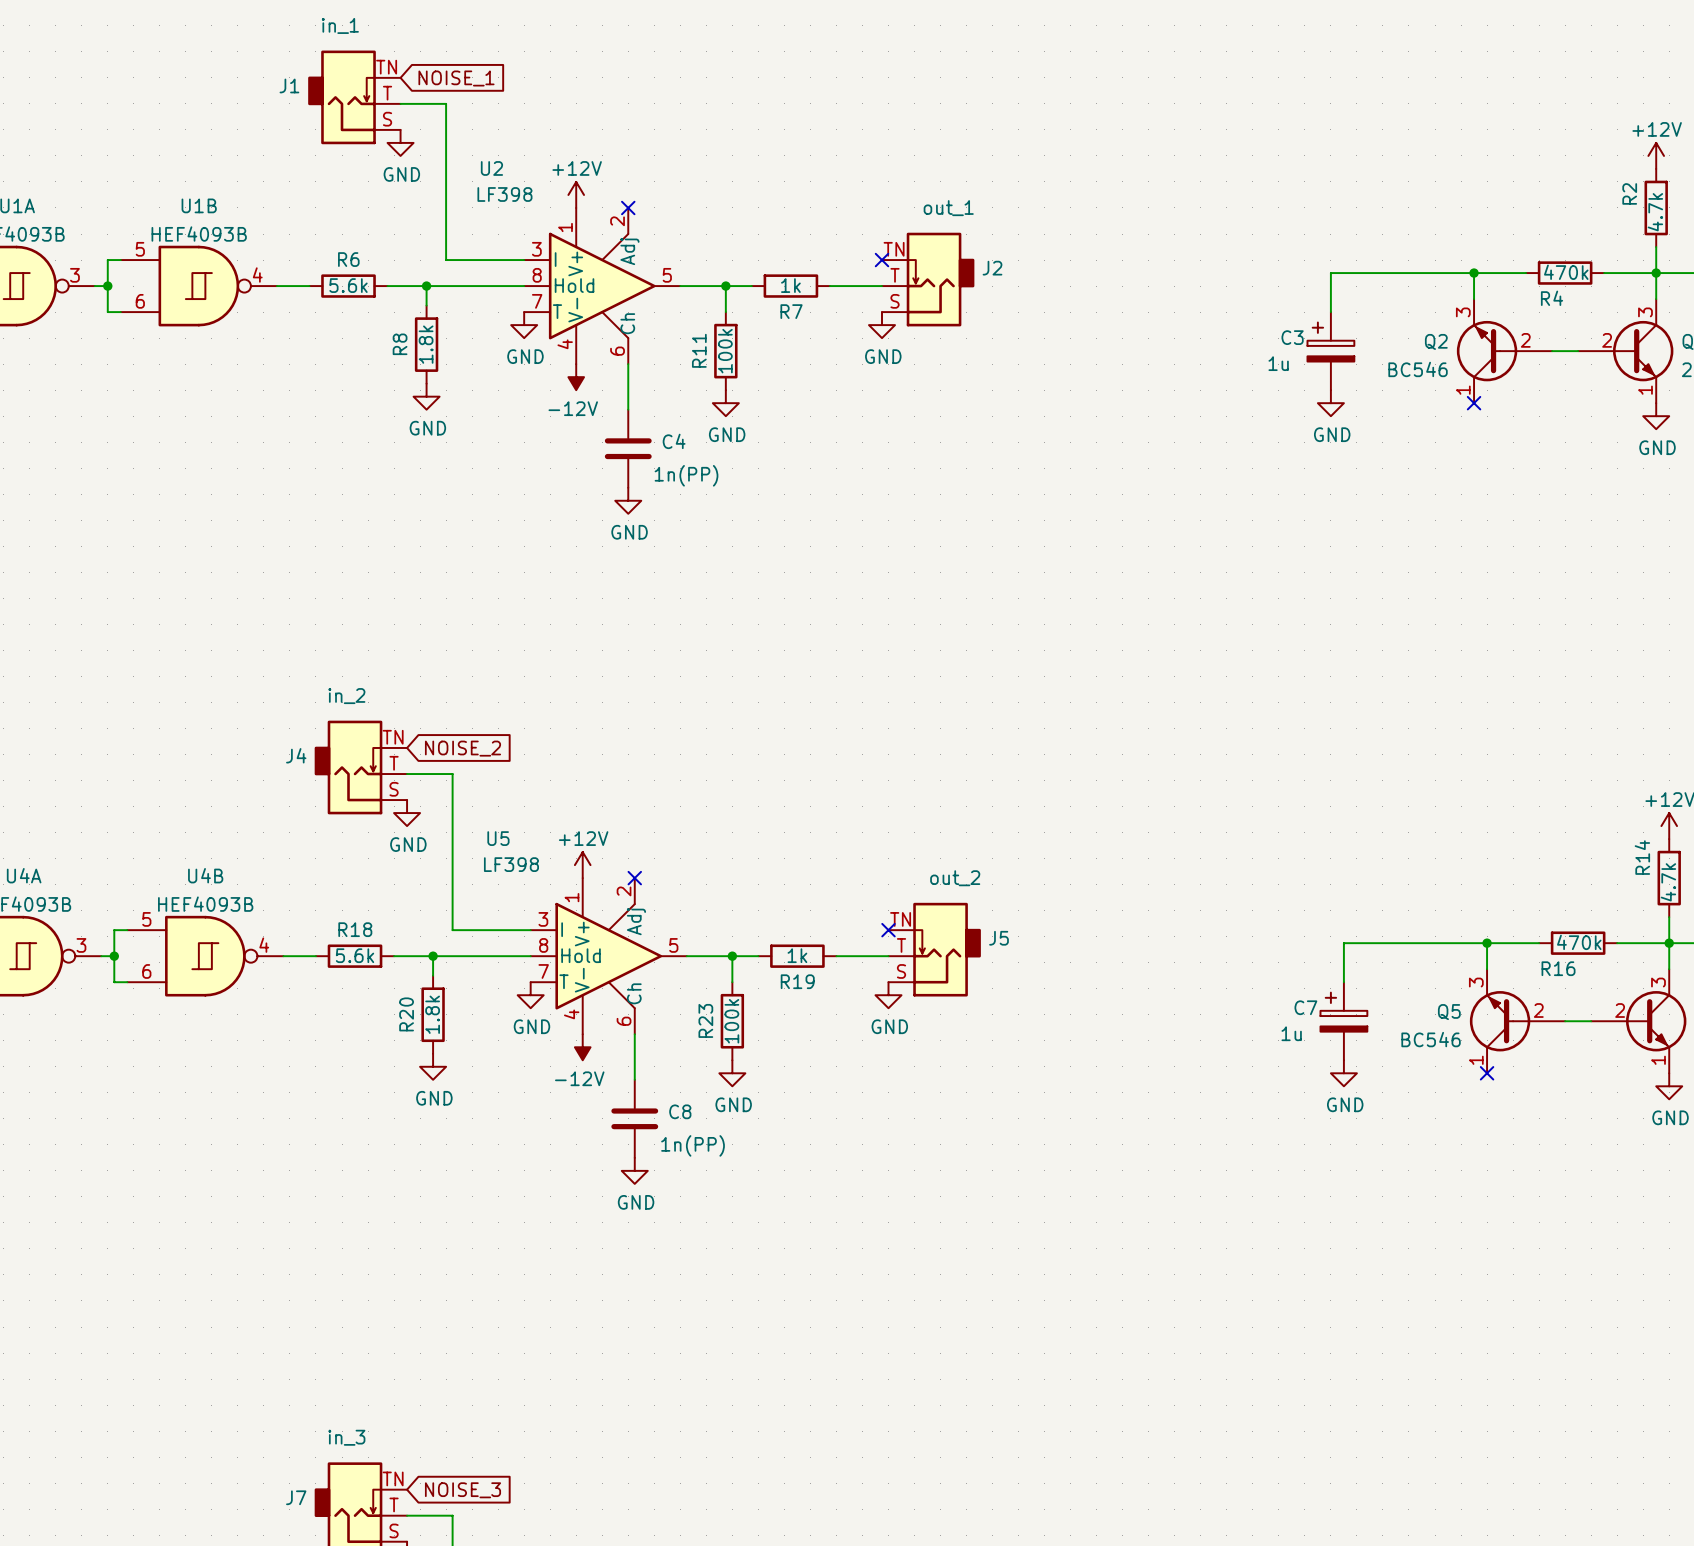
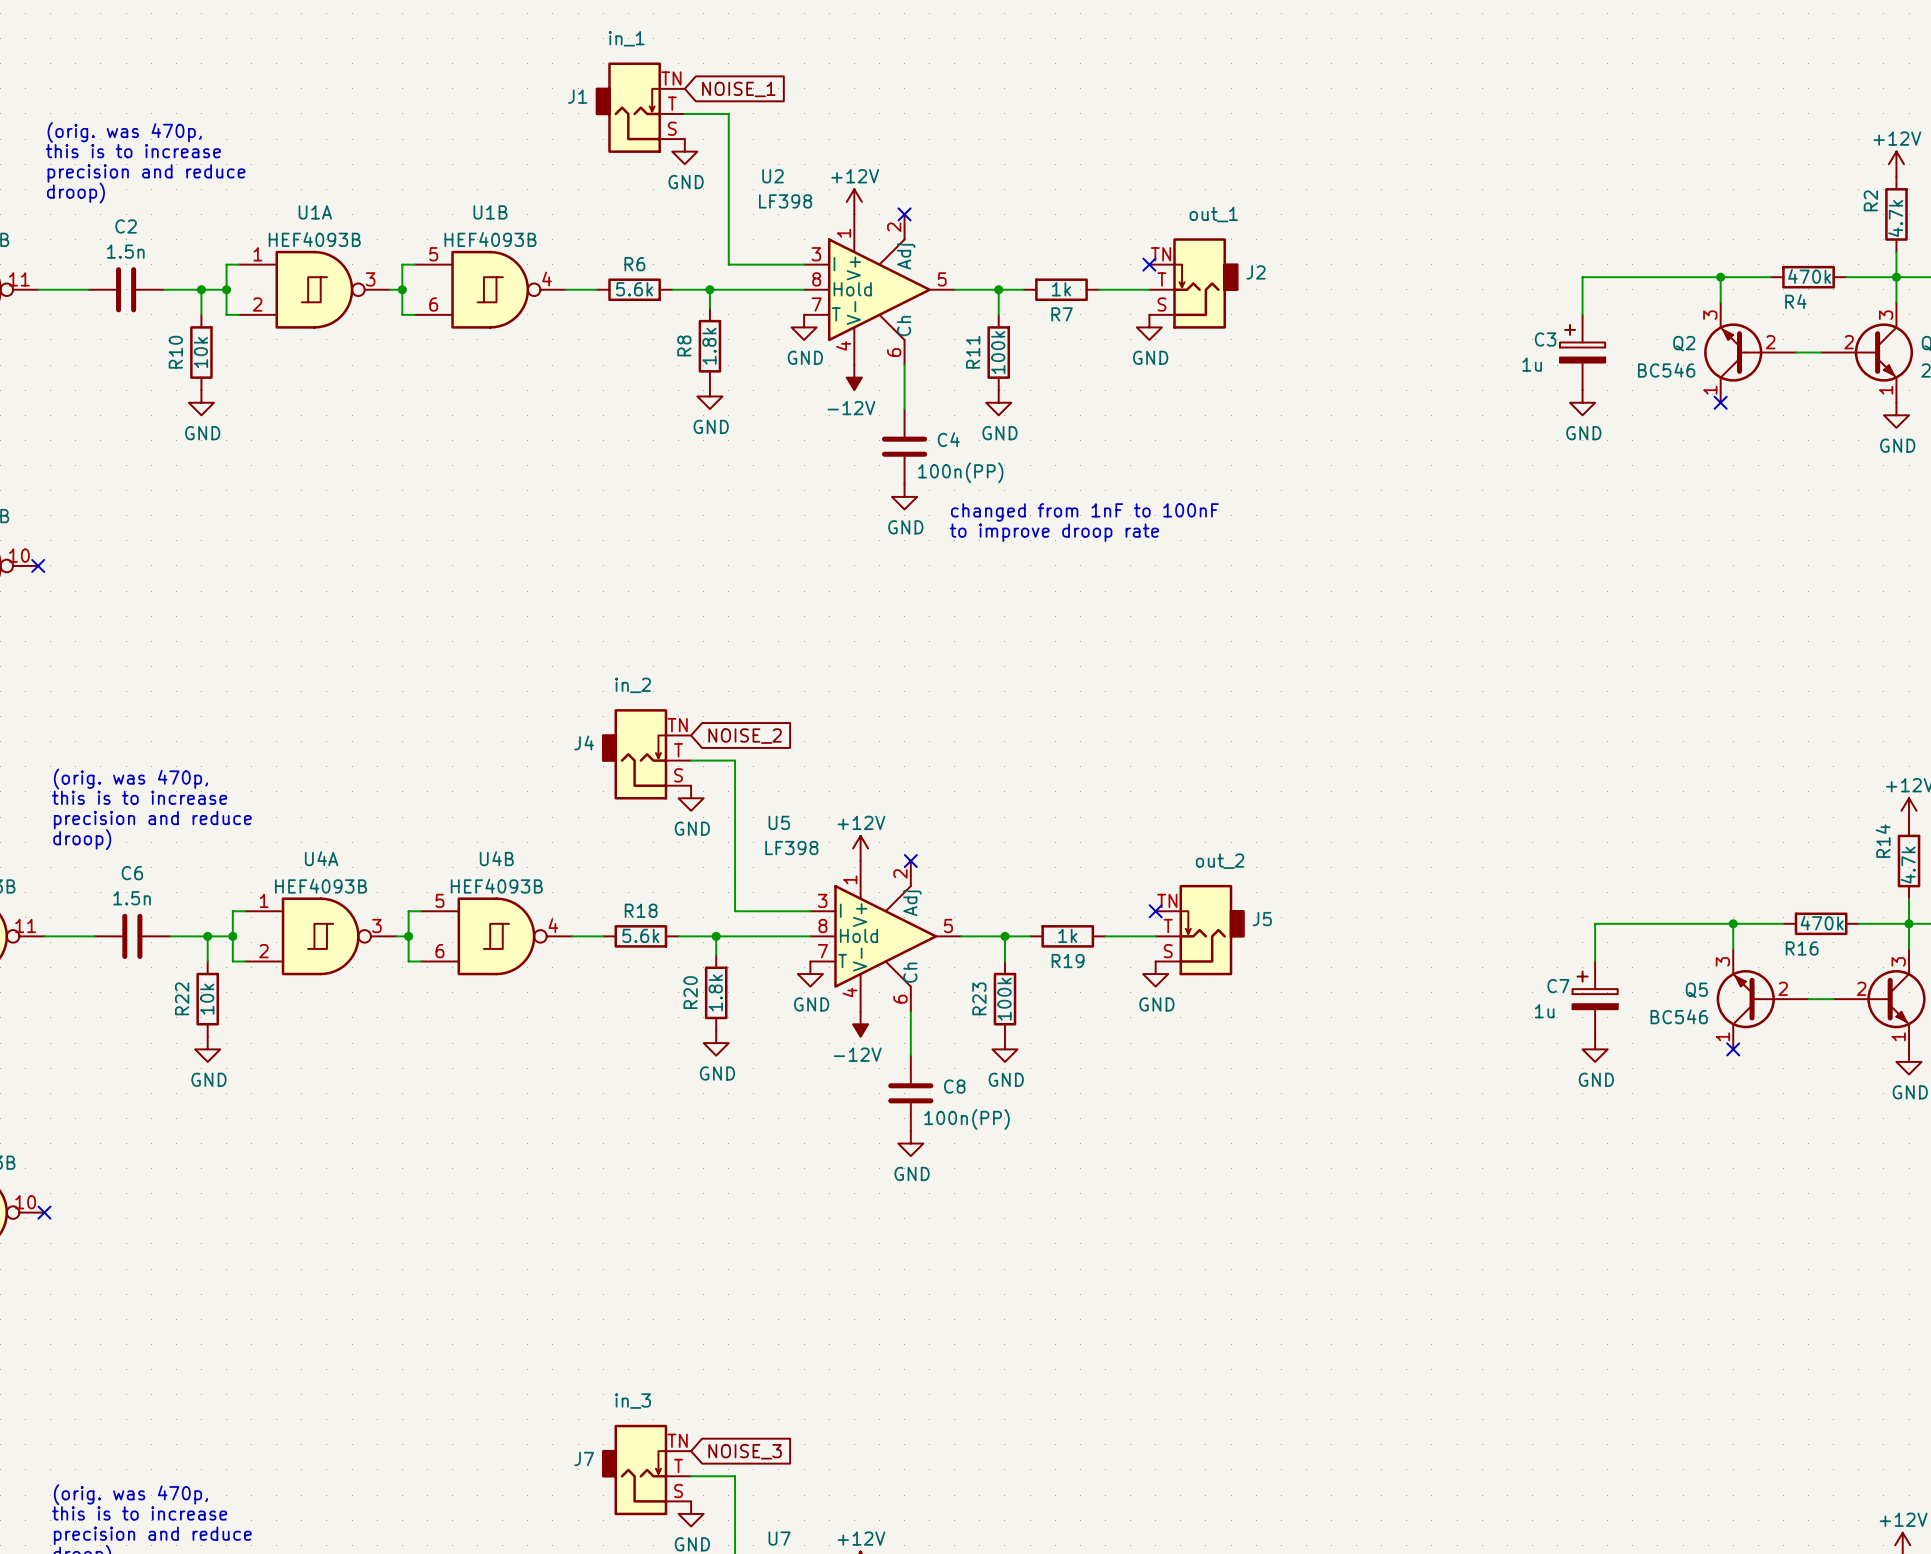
C4 value: 1n(PP) (686, 475) -> 100n(PP) (960, 472)
text: none -> changed from 1nF to 100nF (1084, 512)
text: none -> to improve droop rate (1054, 532)
C8 value: 1n(PP) (693, 1145) -> 100n(PP) (967, 1119)

